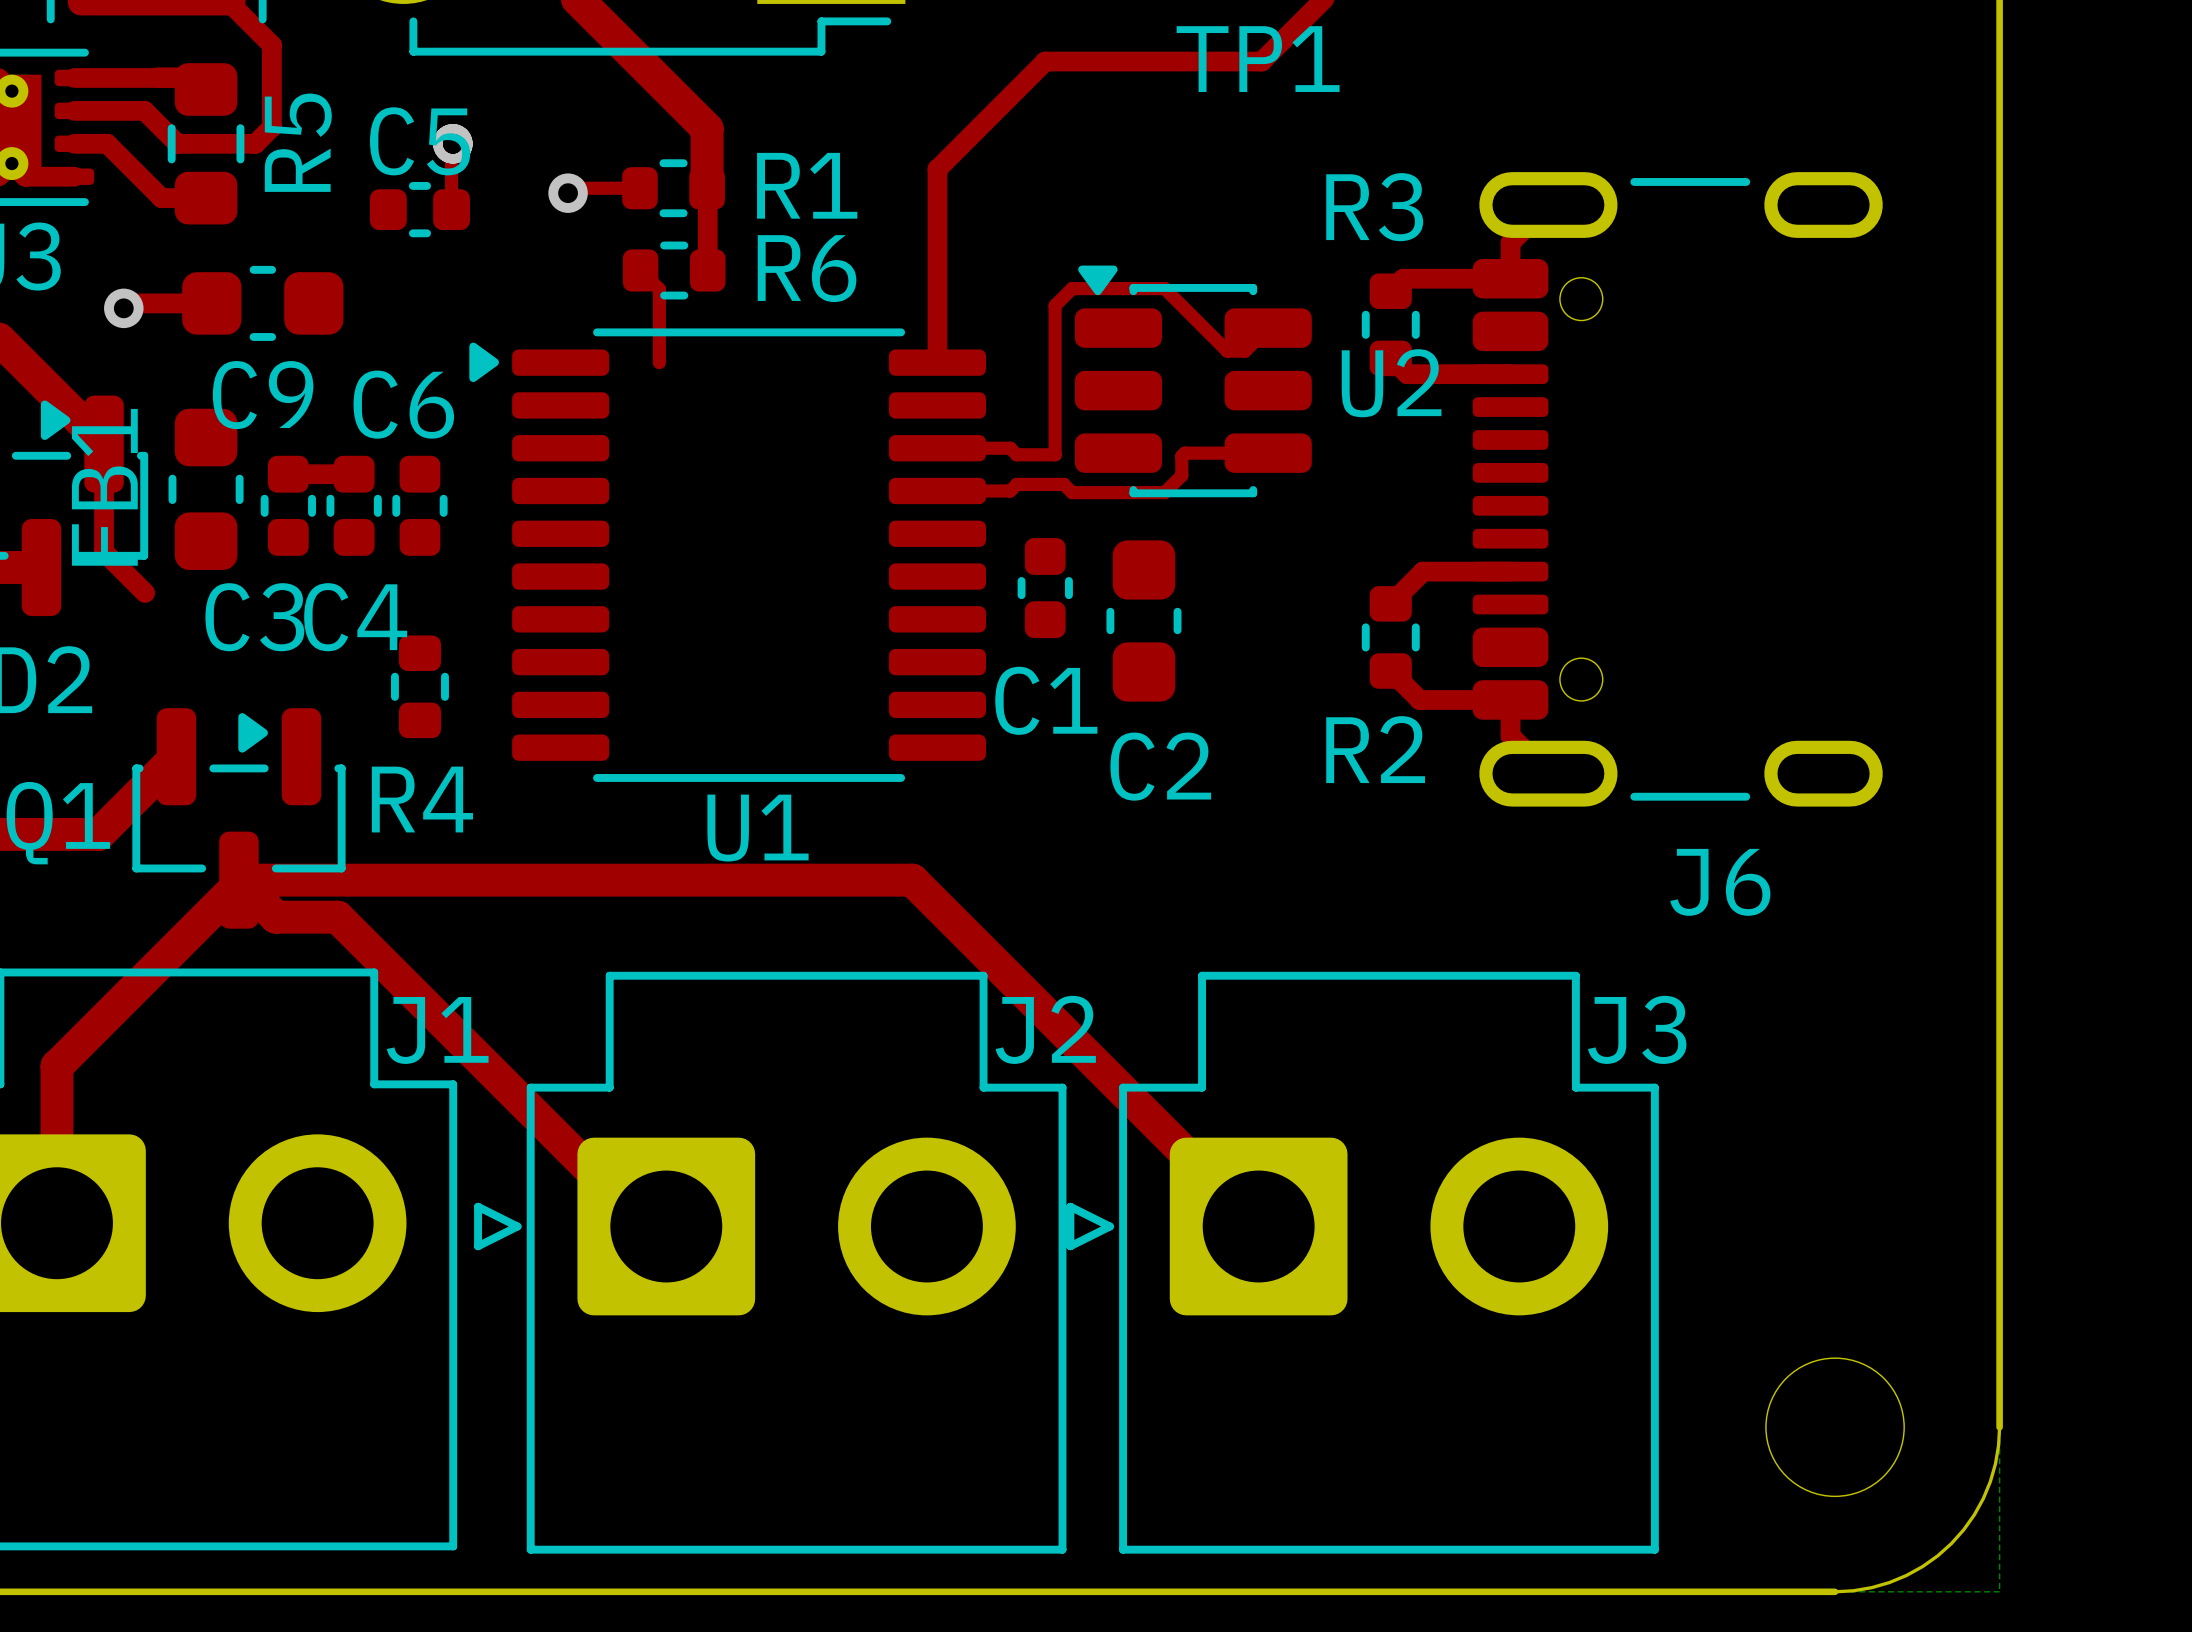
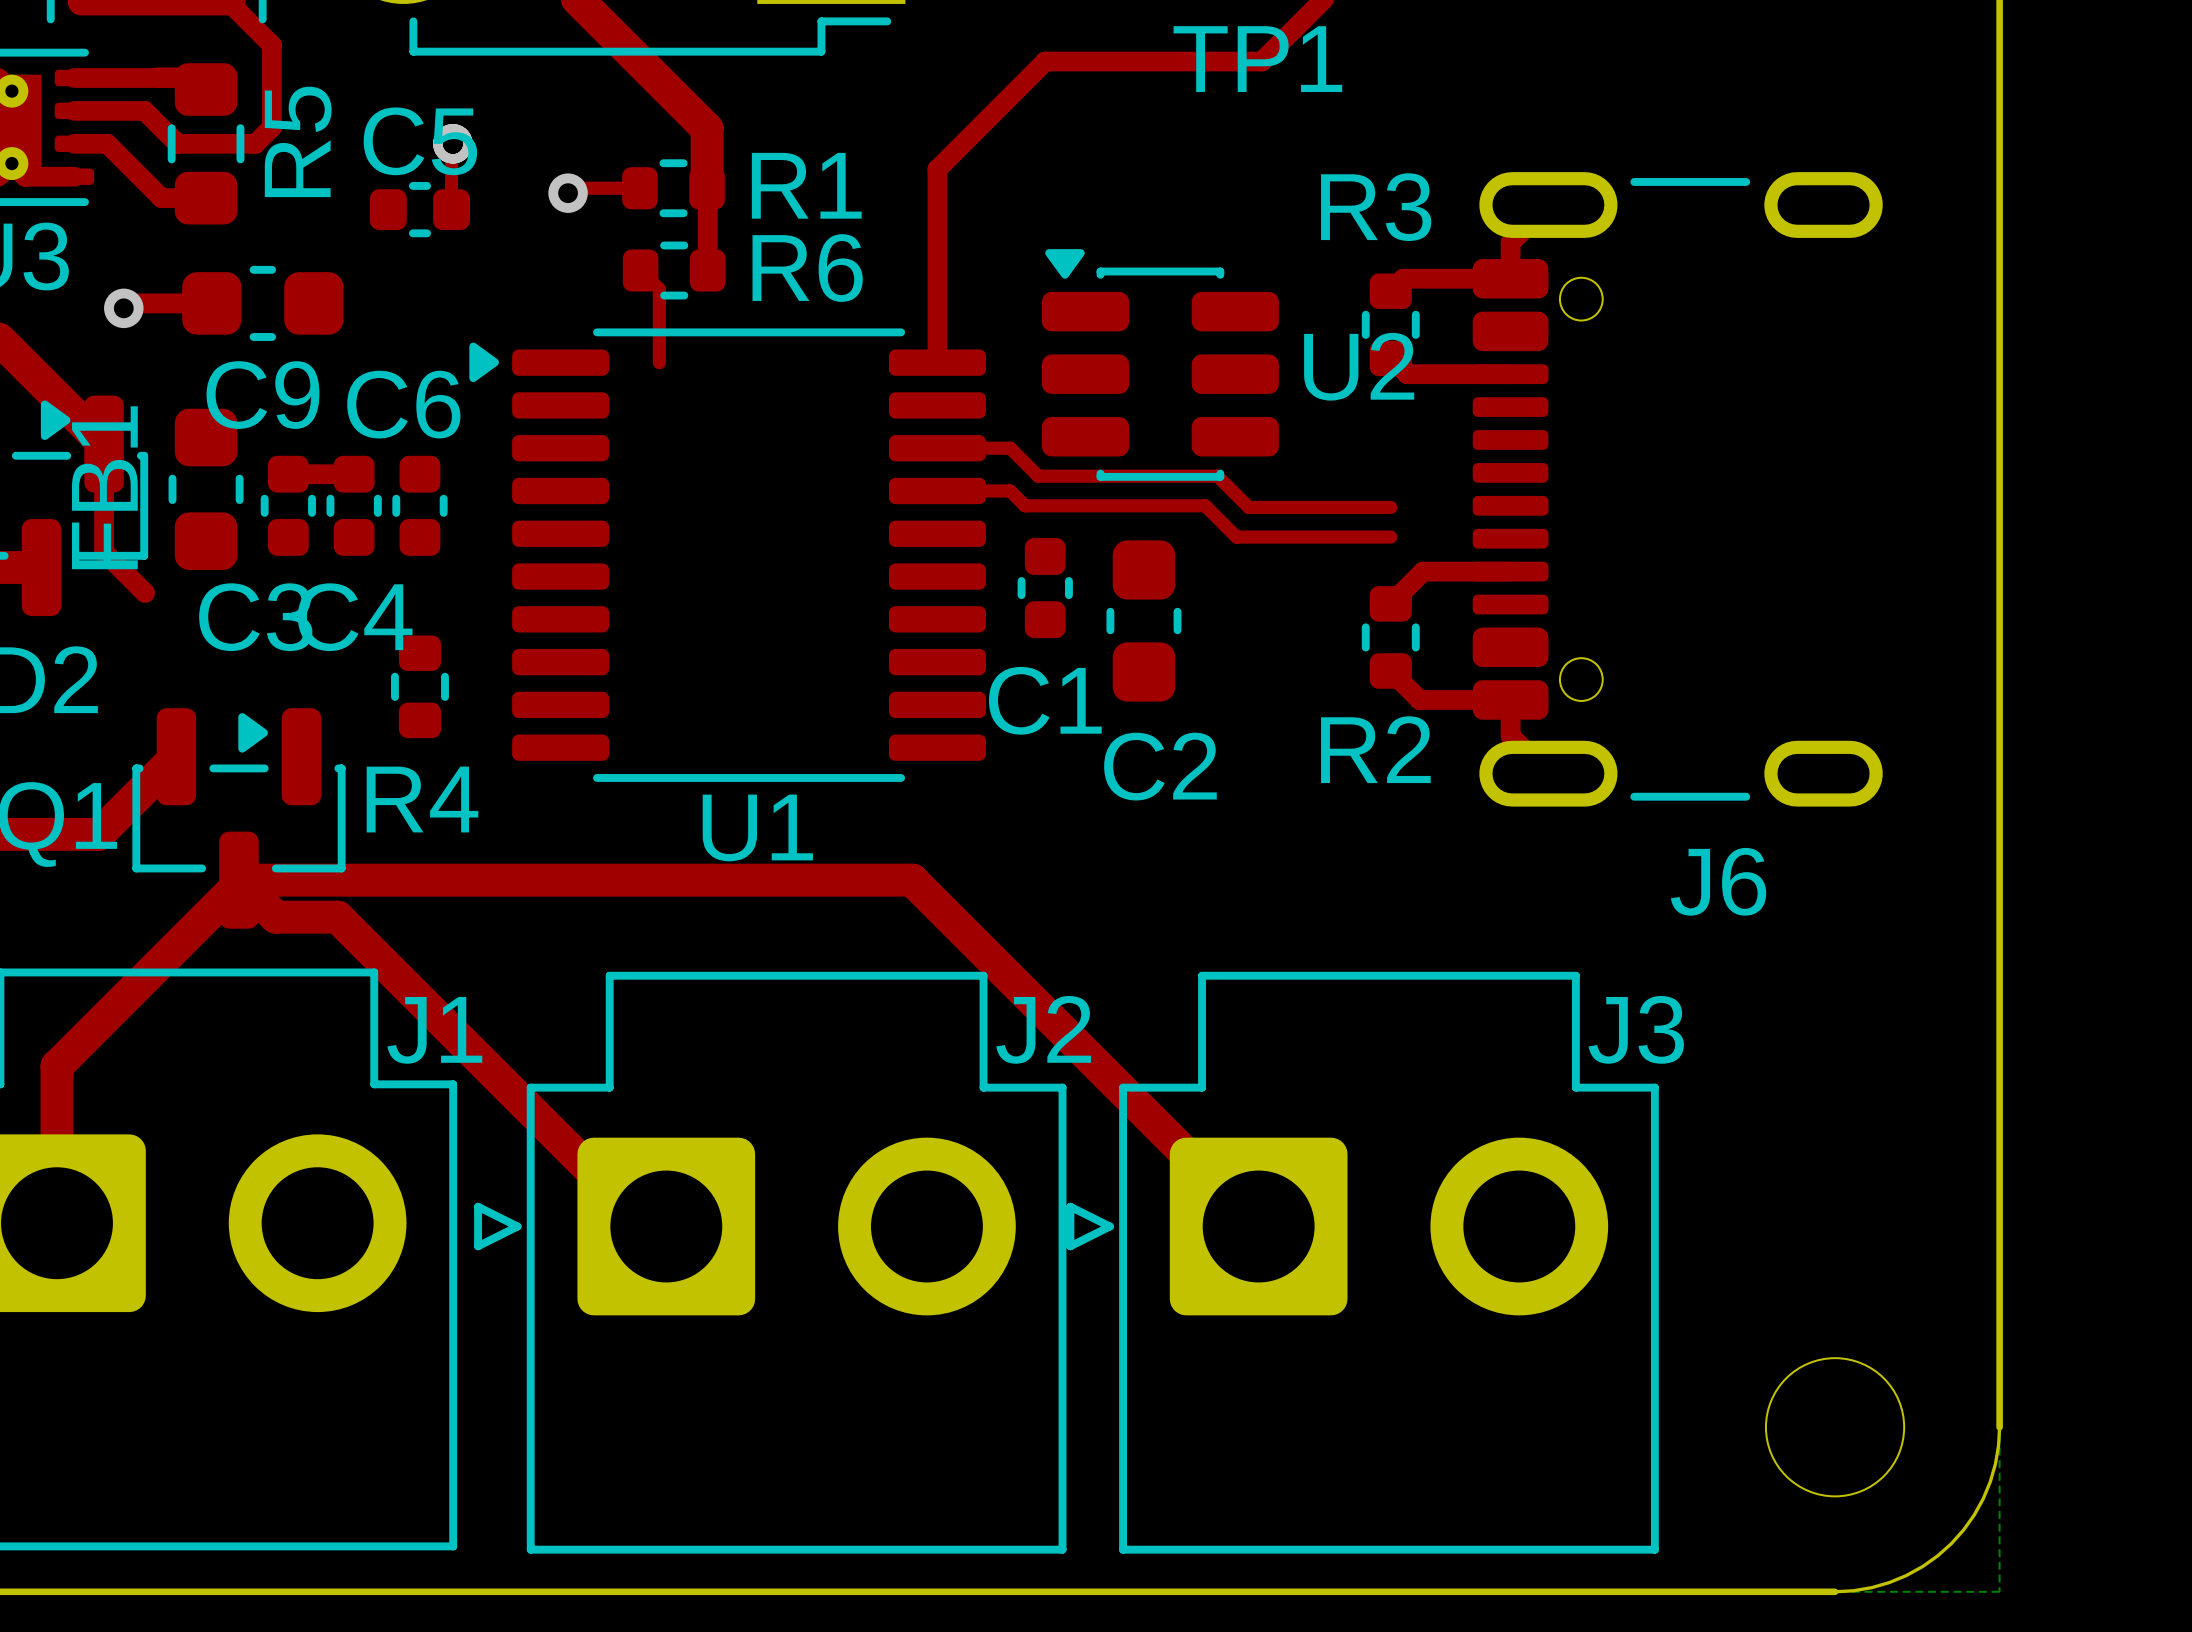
top track: (1268, 328) (1245, 351) (1227, 351) (1164, 288) (1072, 288) (1055, 305) (1055, 454) (1016, 454) -> (1390, 507) (1248, 507) (1217, 476) (1038, 476) (1016, 454)
U2 position: (1193, 381) -> (1160, 364)
top track: (1268, 453) (1185, 453) (1181, 456) (1181, 475) (1164, 492) (1072, 492) (1063, 484) (1016, 484) (1010, 490) -> (1390, 537) (1236, 537) (1205, 505) (1025, 505) (1010, 490)

